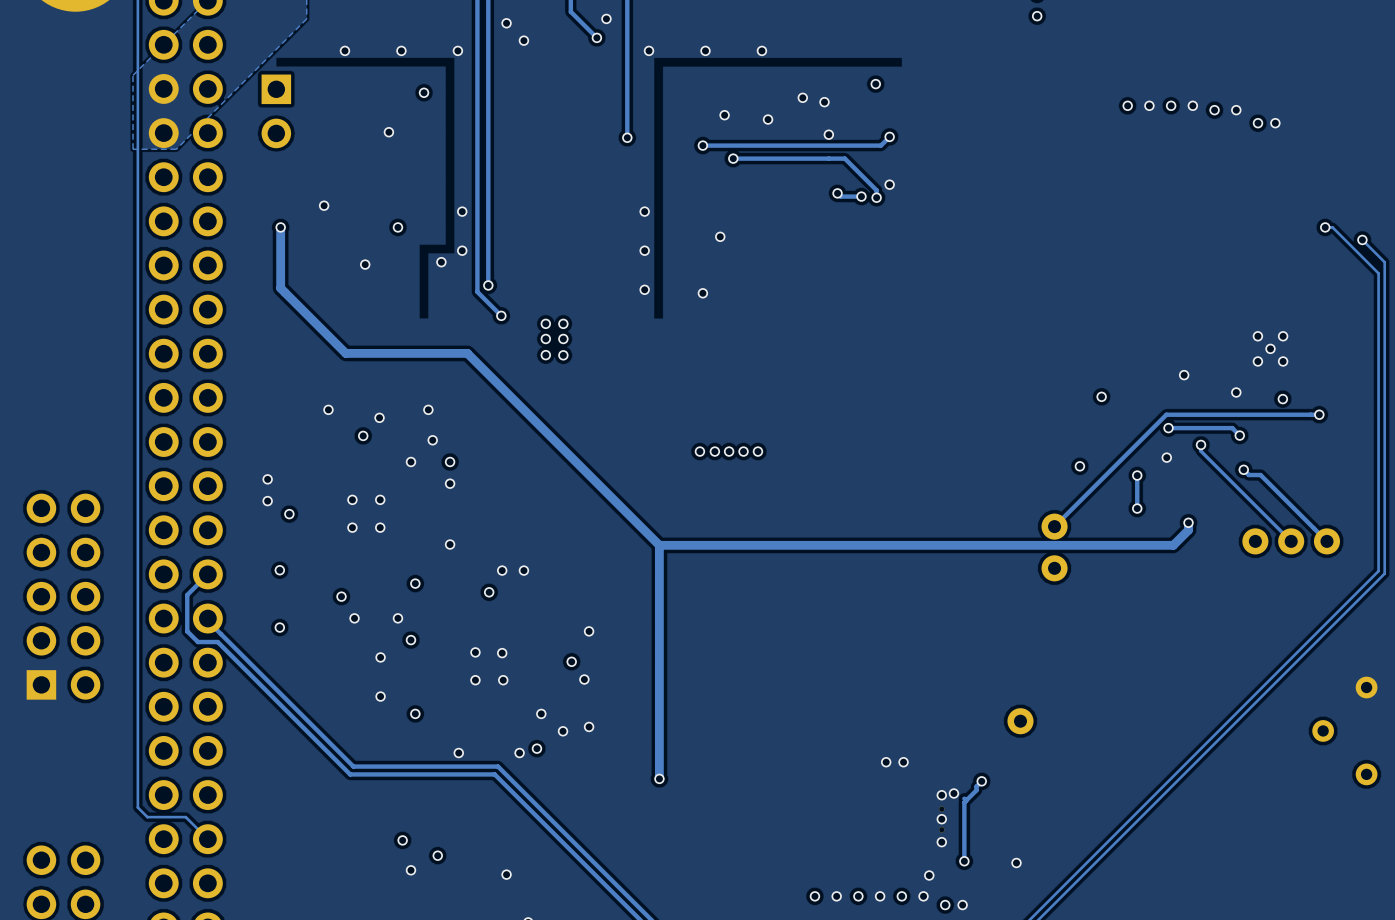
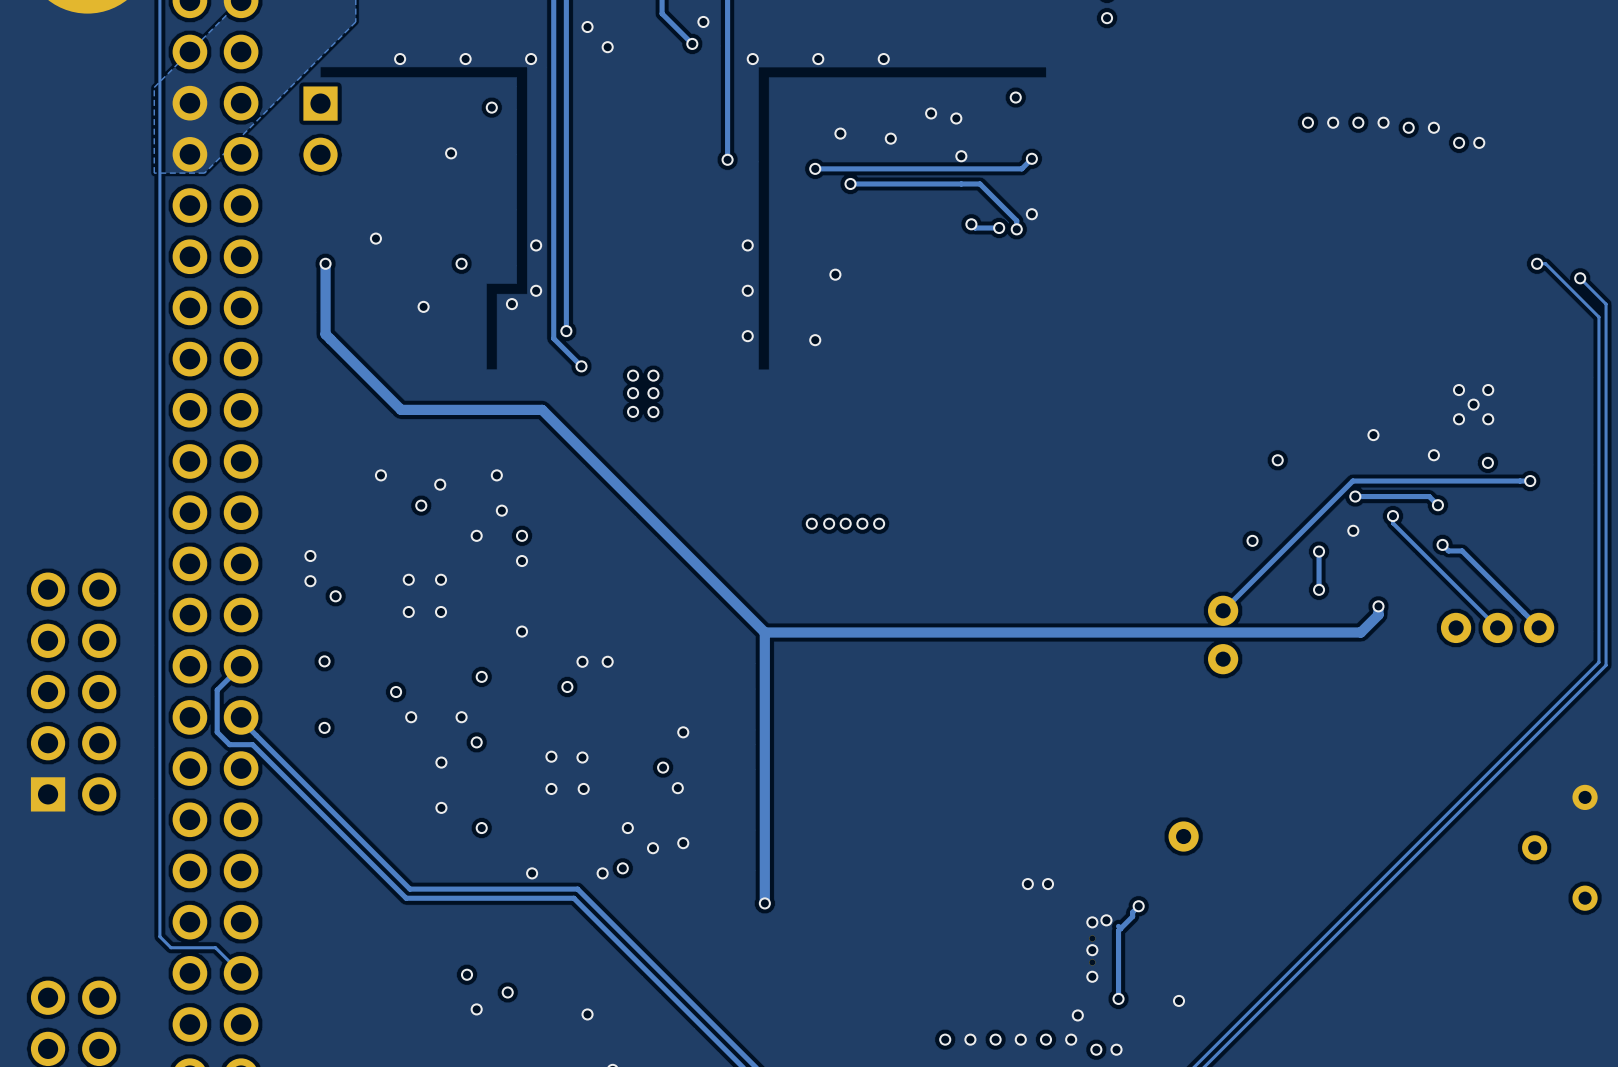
via: none -> (1107, 18)
via: (1037, 16) -> none

